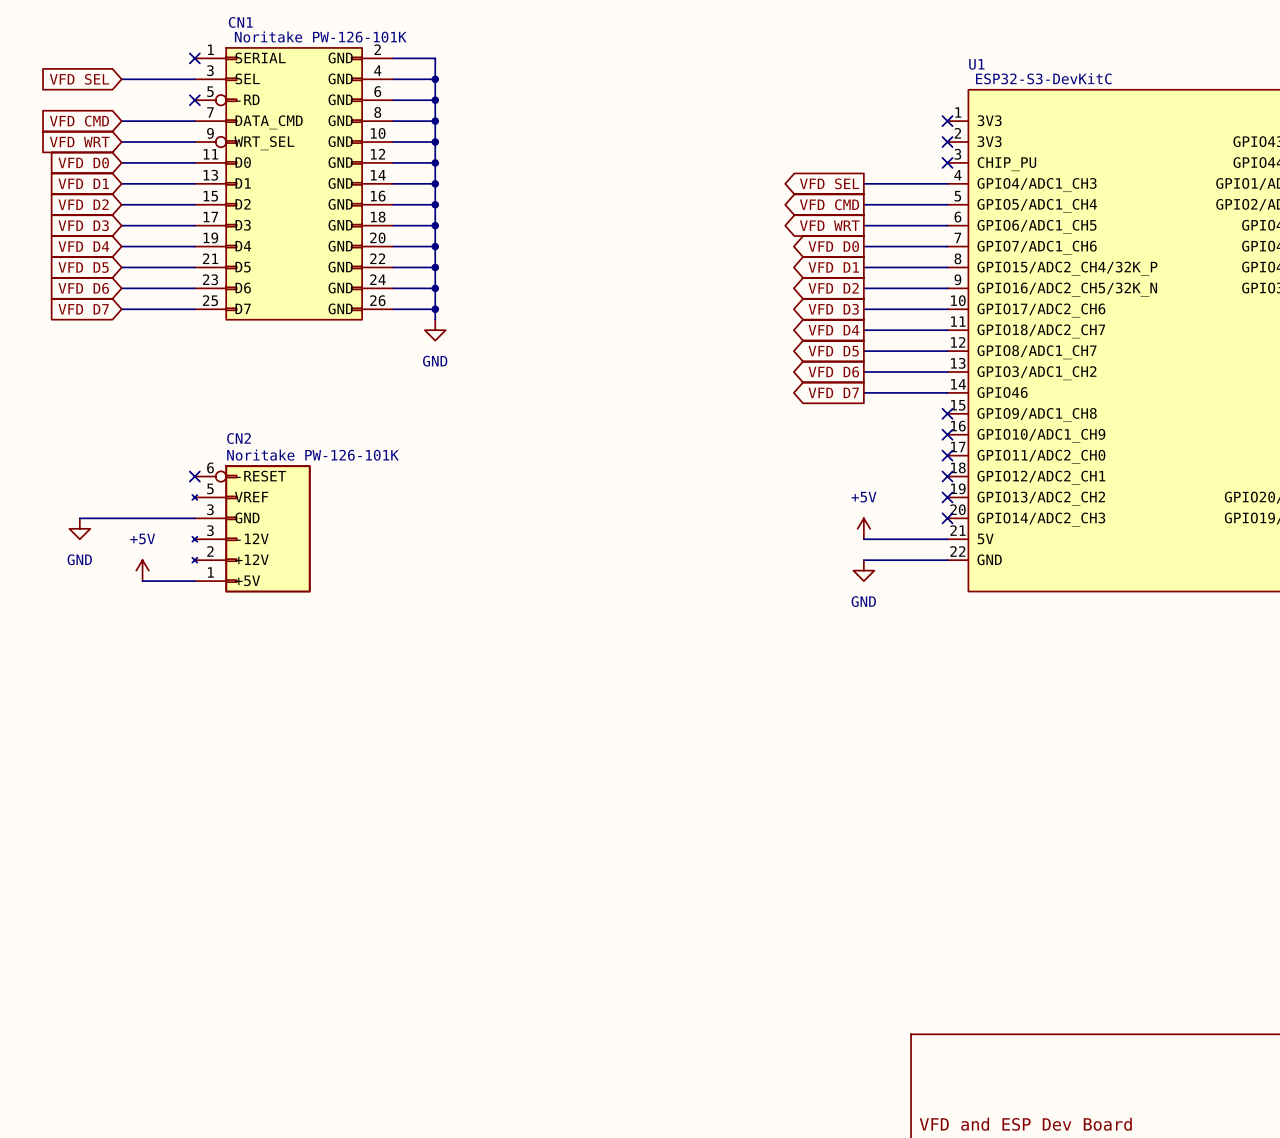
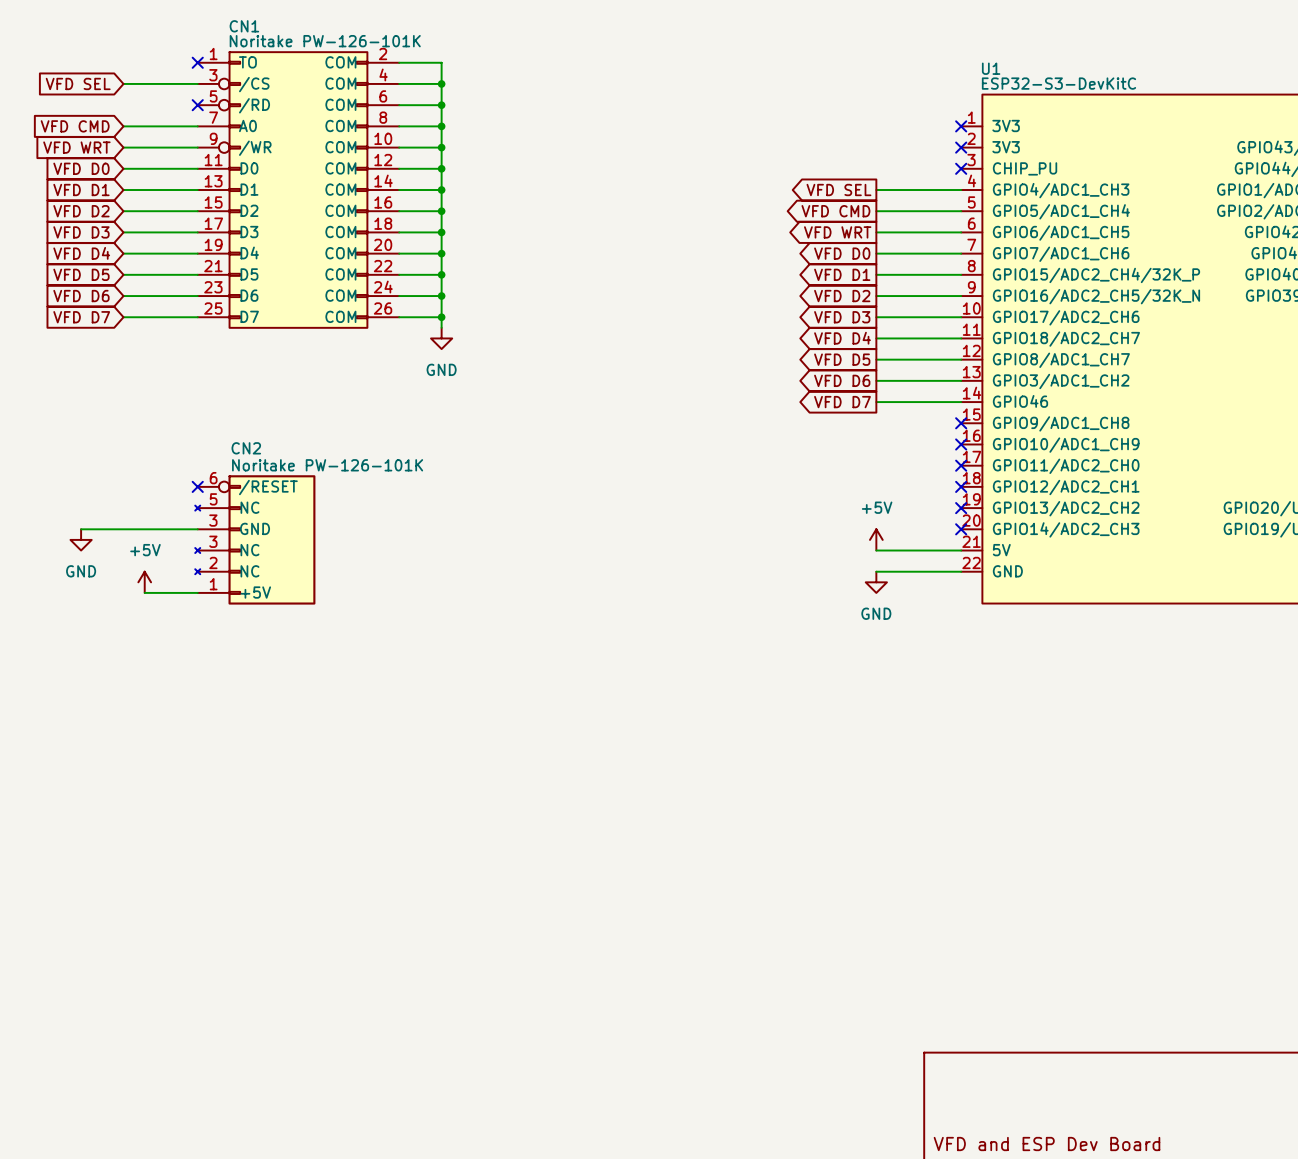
CN1 symbol: [194, 47, 394, 320] -> [197, 52, 400, 328]
CN2 pin name: -RESET (261, 476) -> /RESET (268, 487)
CN2 pin name: VREF (251, 497) -> NC (249, 507)
CN2 pin name: -12V (252, 538) -> NC (249, 550)
CN2 pin name: +12V (251, 559) -> NC (249, 571)

